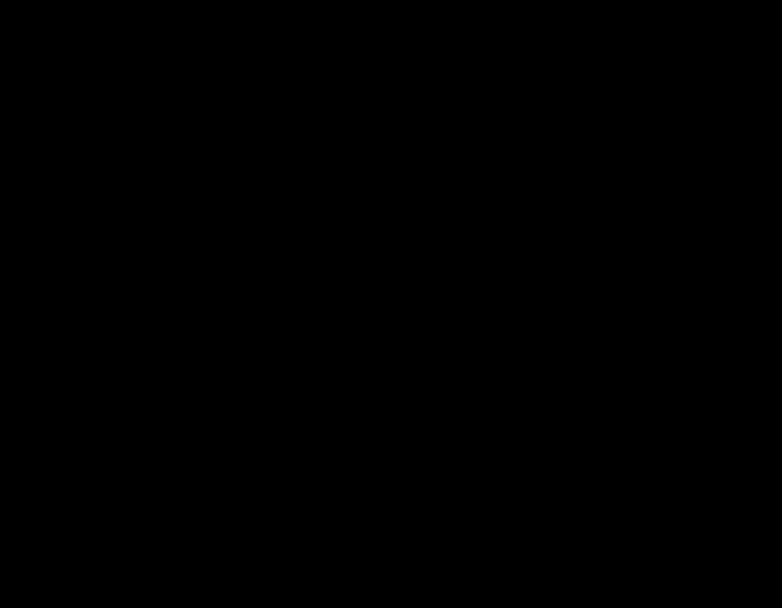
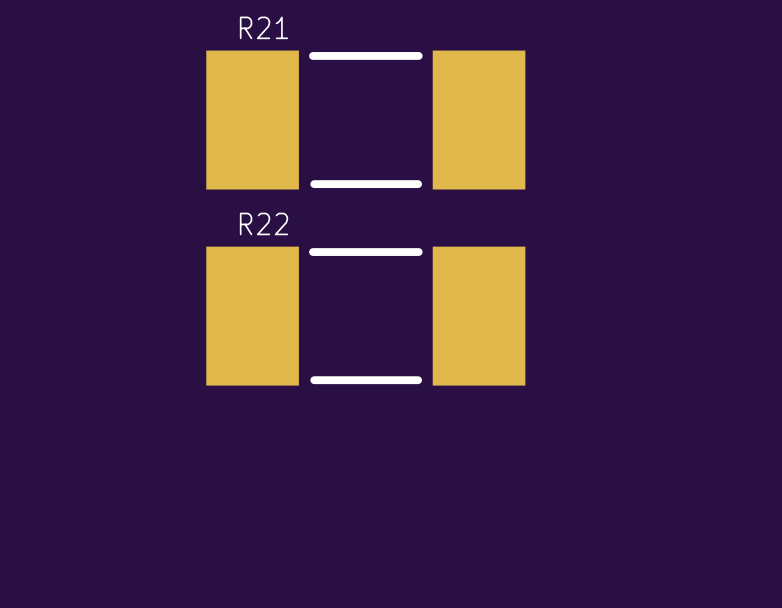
R21: none -> (365, 120)
R22: none -> (365, 316)

